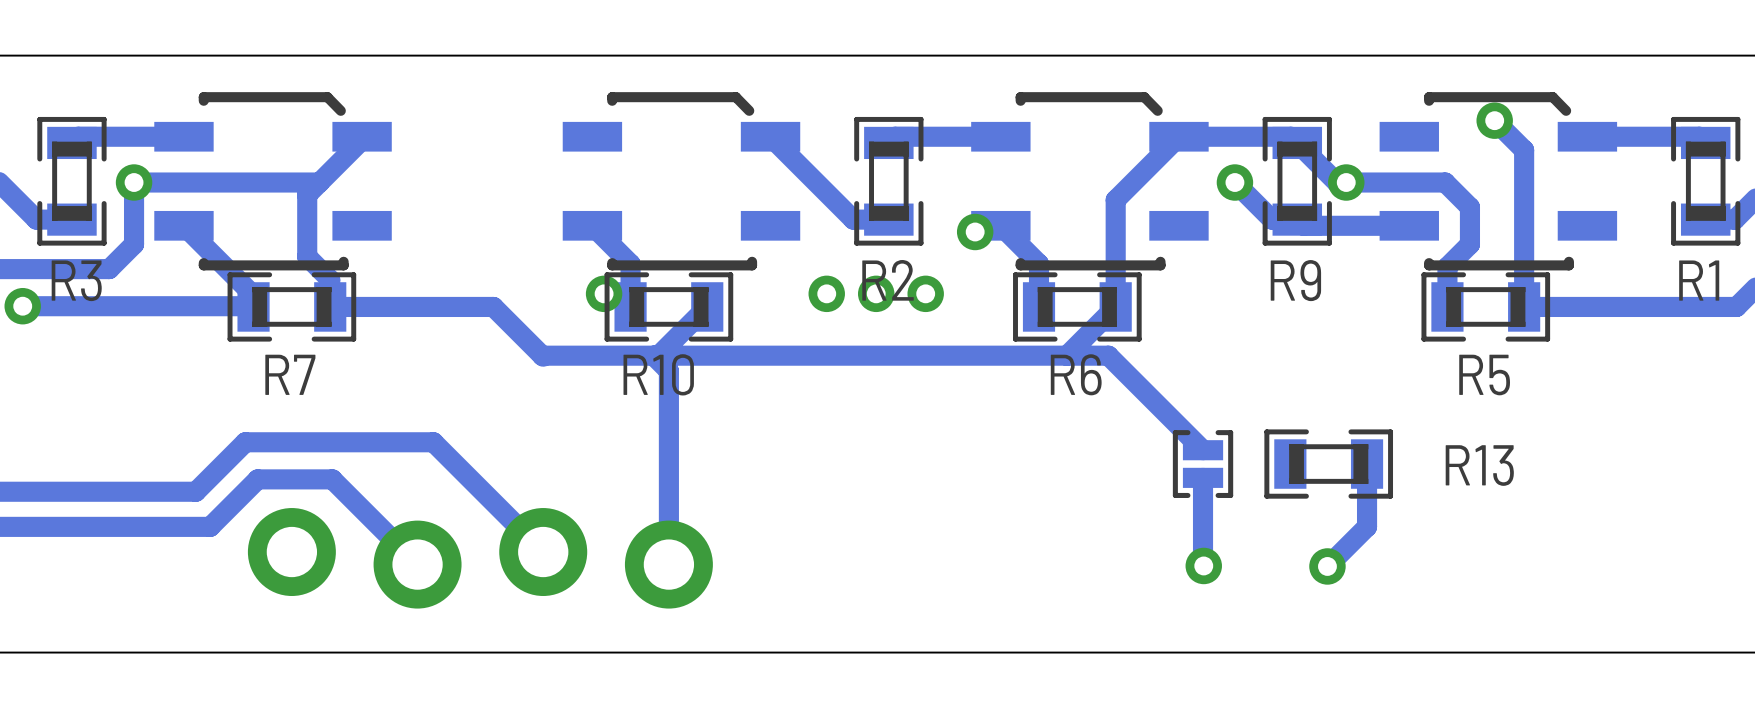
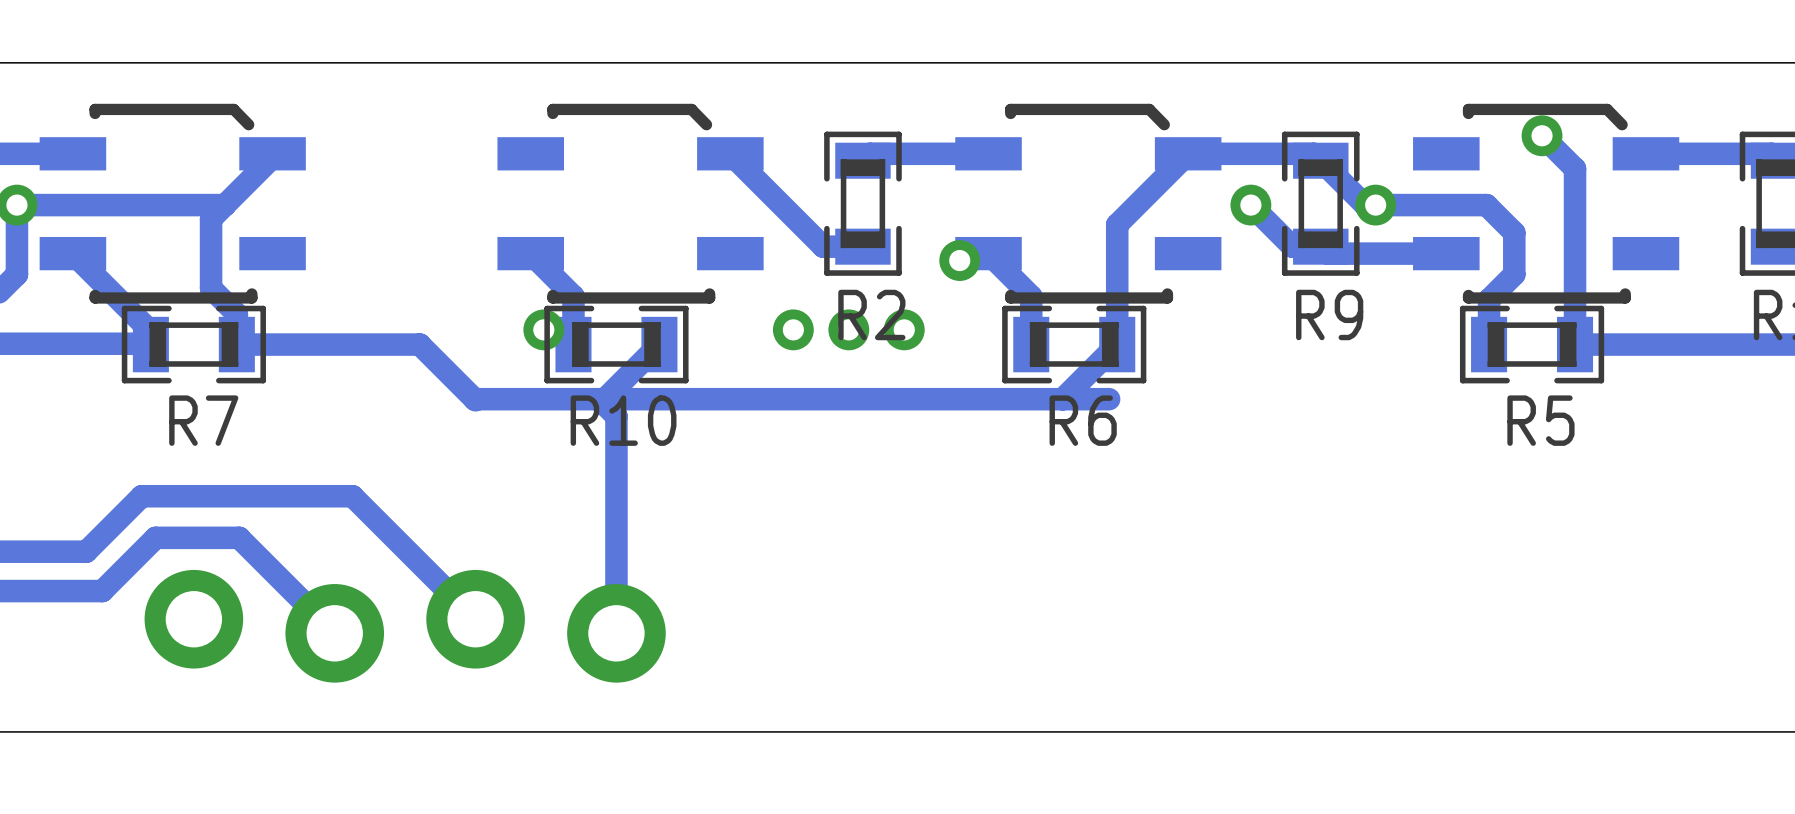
track: (1108, 355) (1203, 450) -> none
part: (1203, 464) -> none
R13: (1328, 464) -> none
track: (1367, 464) (1367, 526) (1327, 566) -> none
track: (1203, 477) (1203, 565) -> none
via: (1203, 565) -> none
via: (1327, 566) -> none

